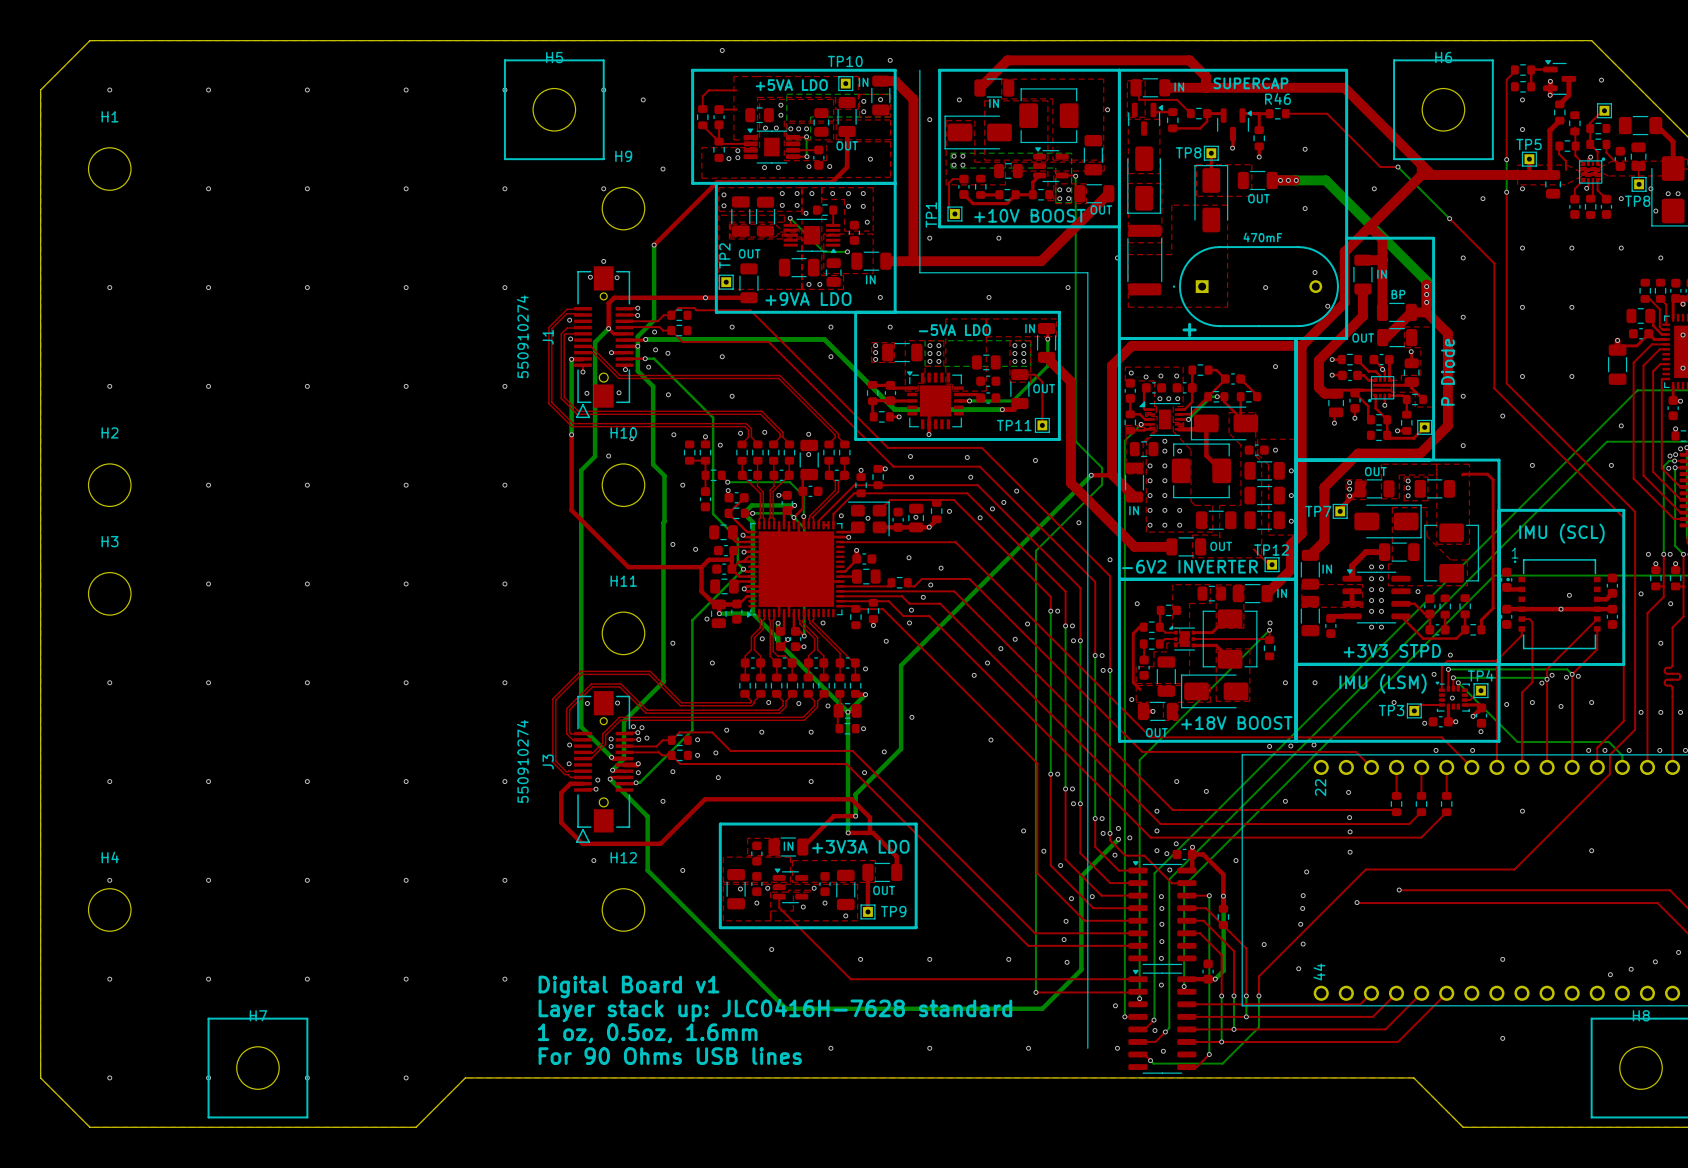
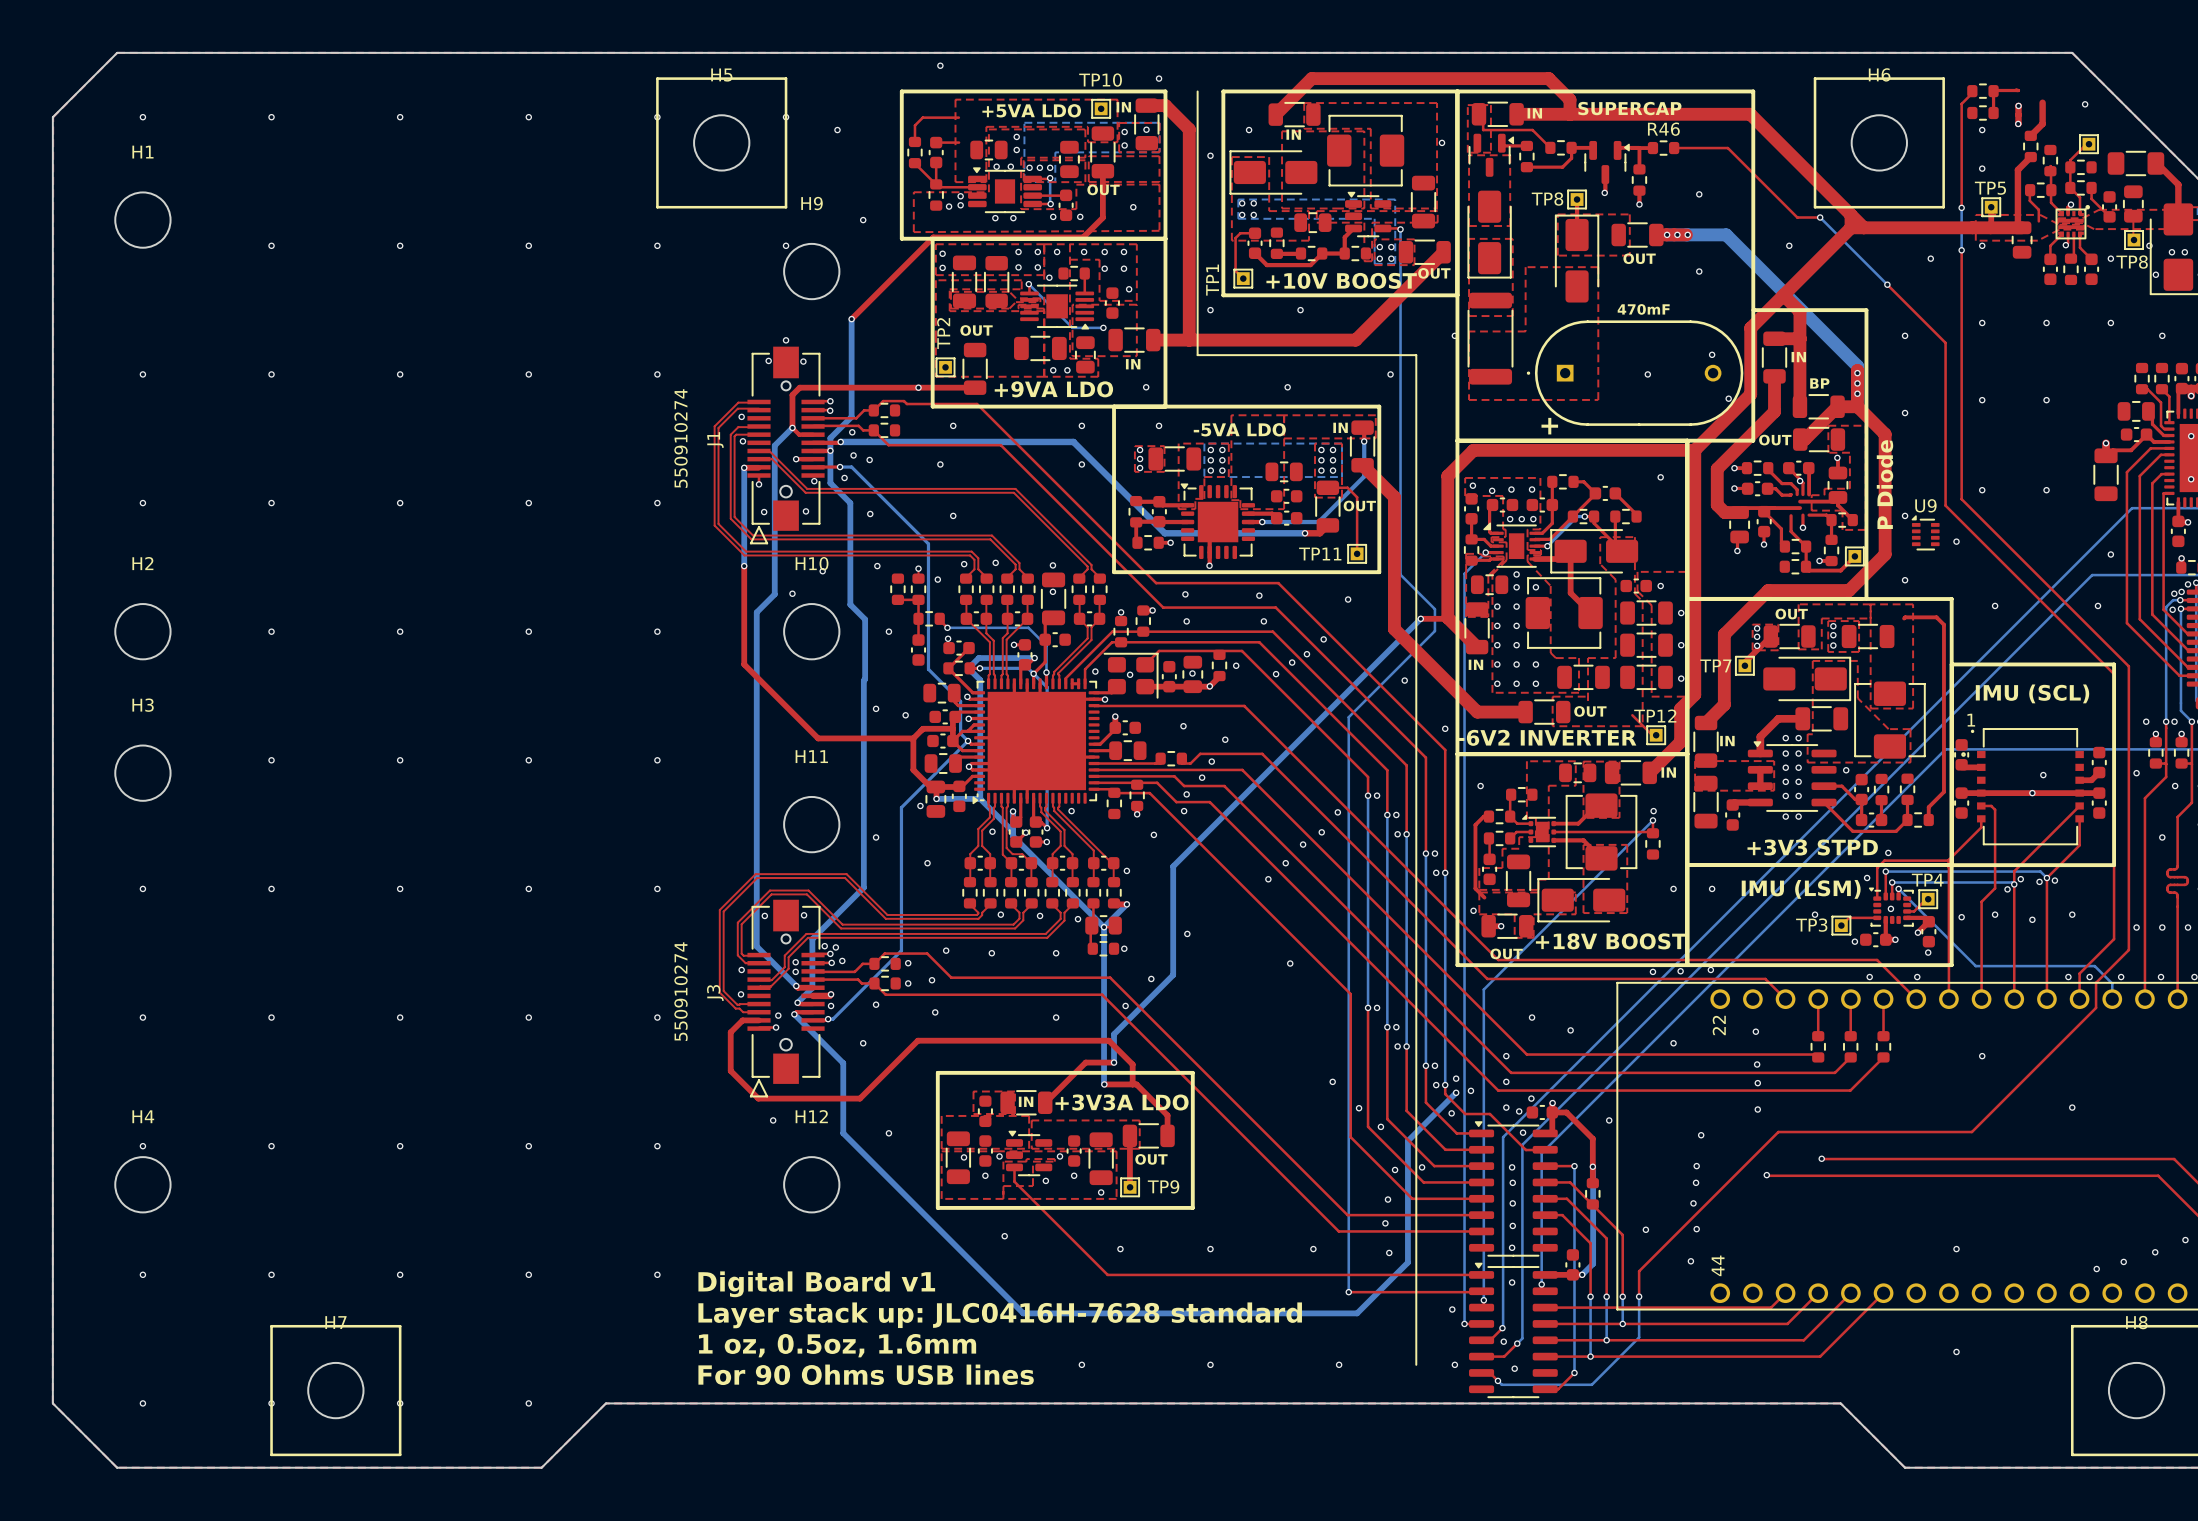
part: (1559, 77) -> none
part: (1380, 389) -> none
U9: none -> (1925, 532)

